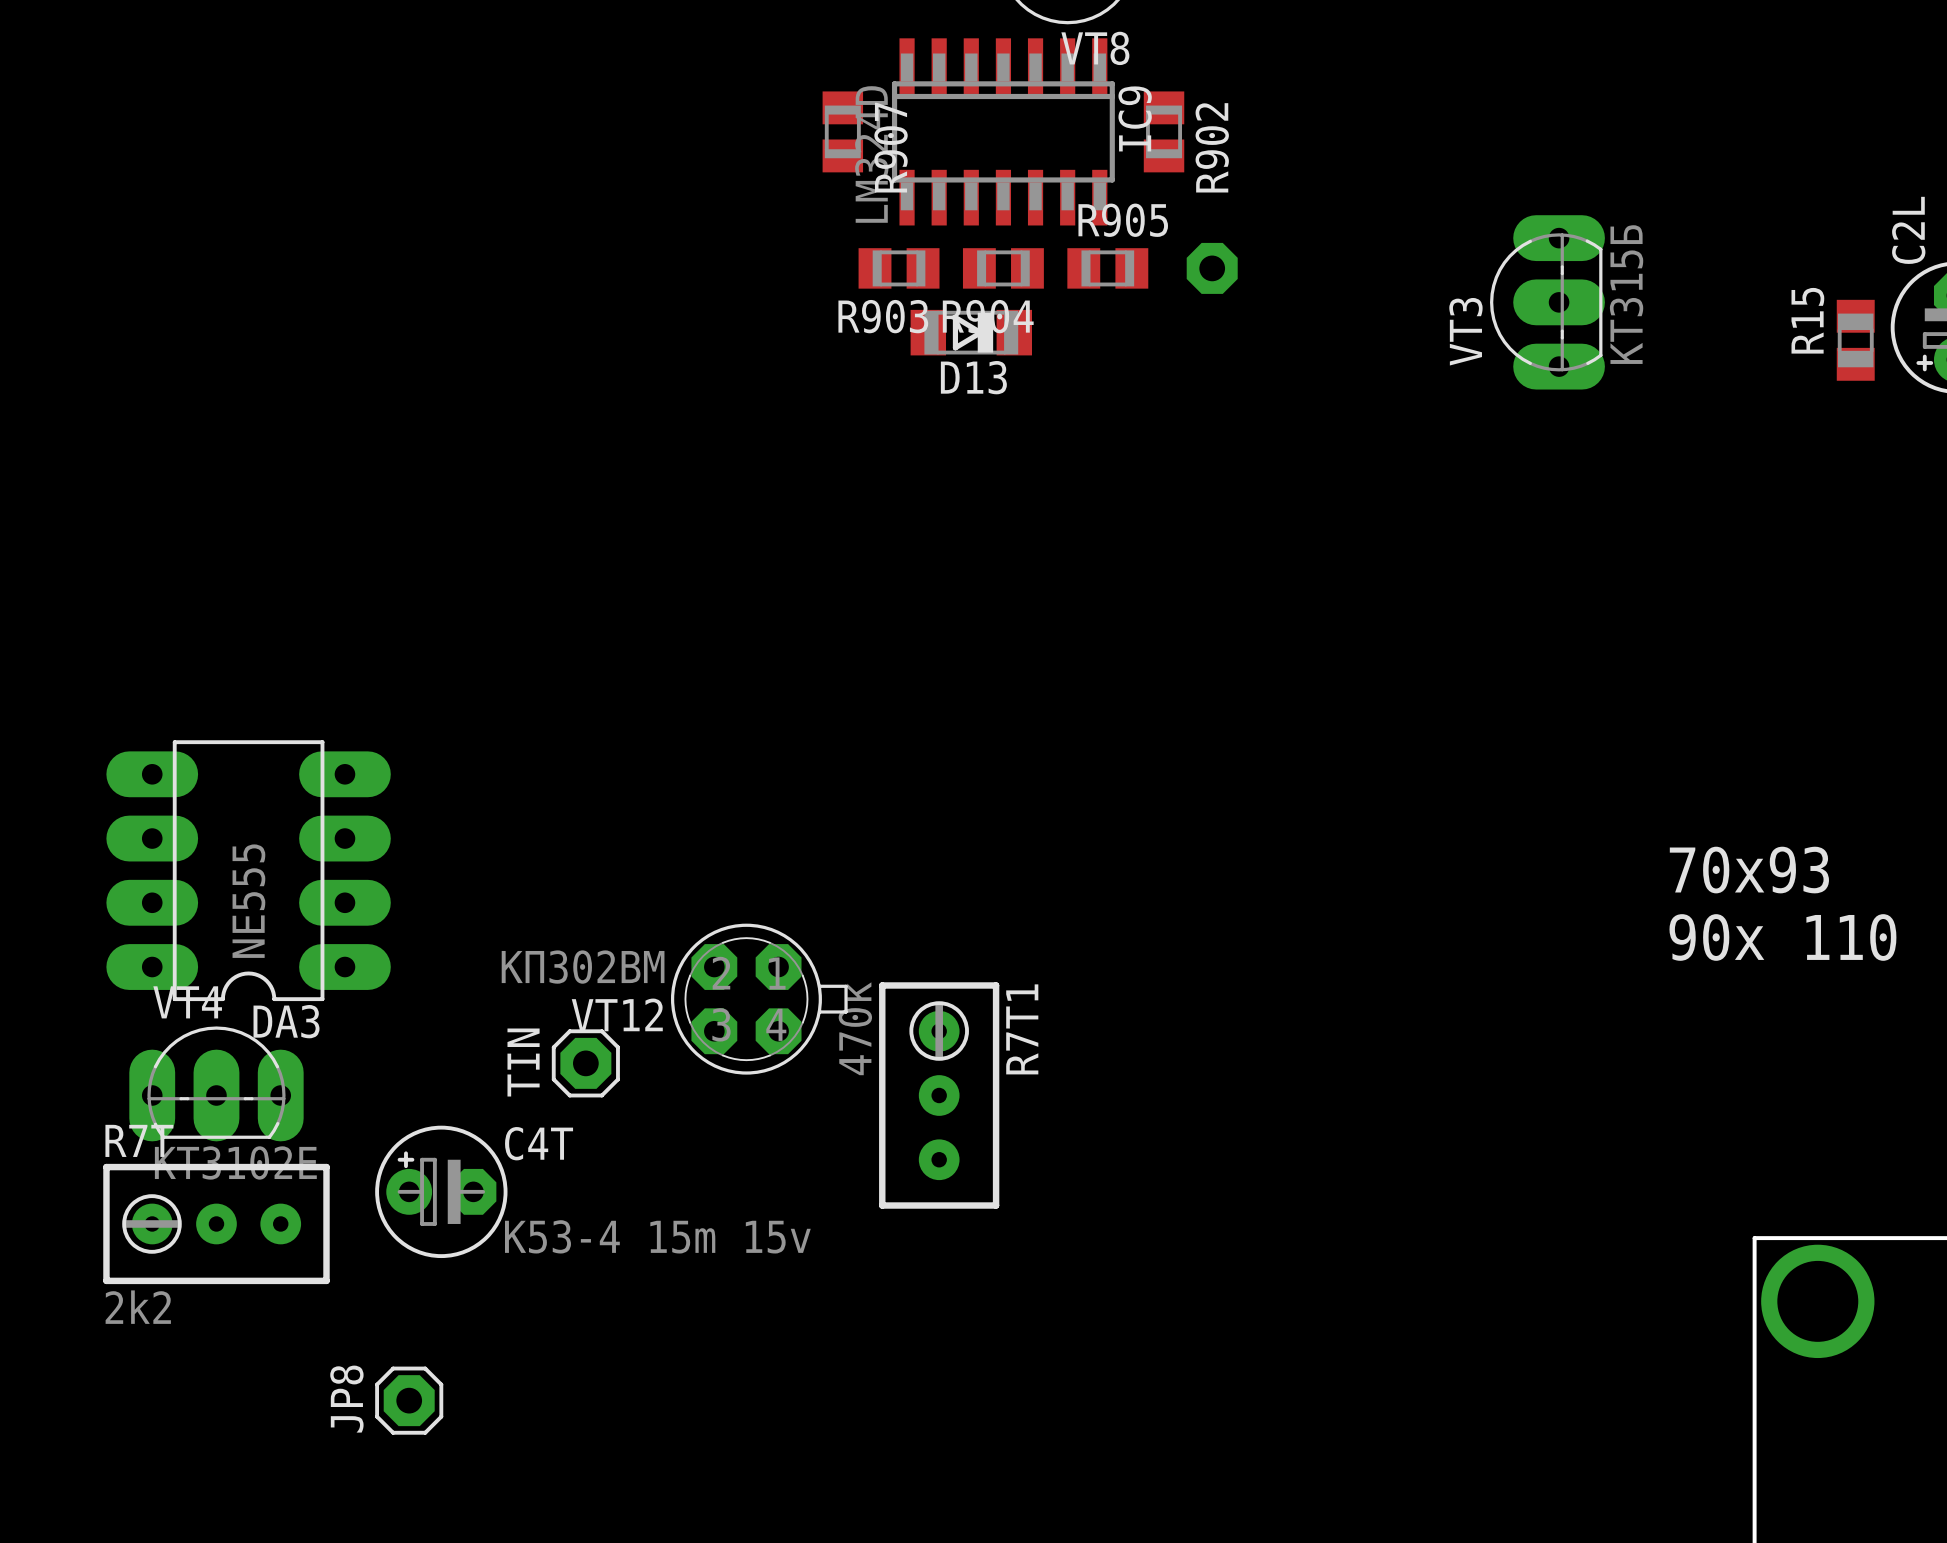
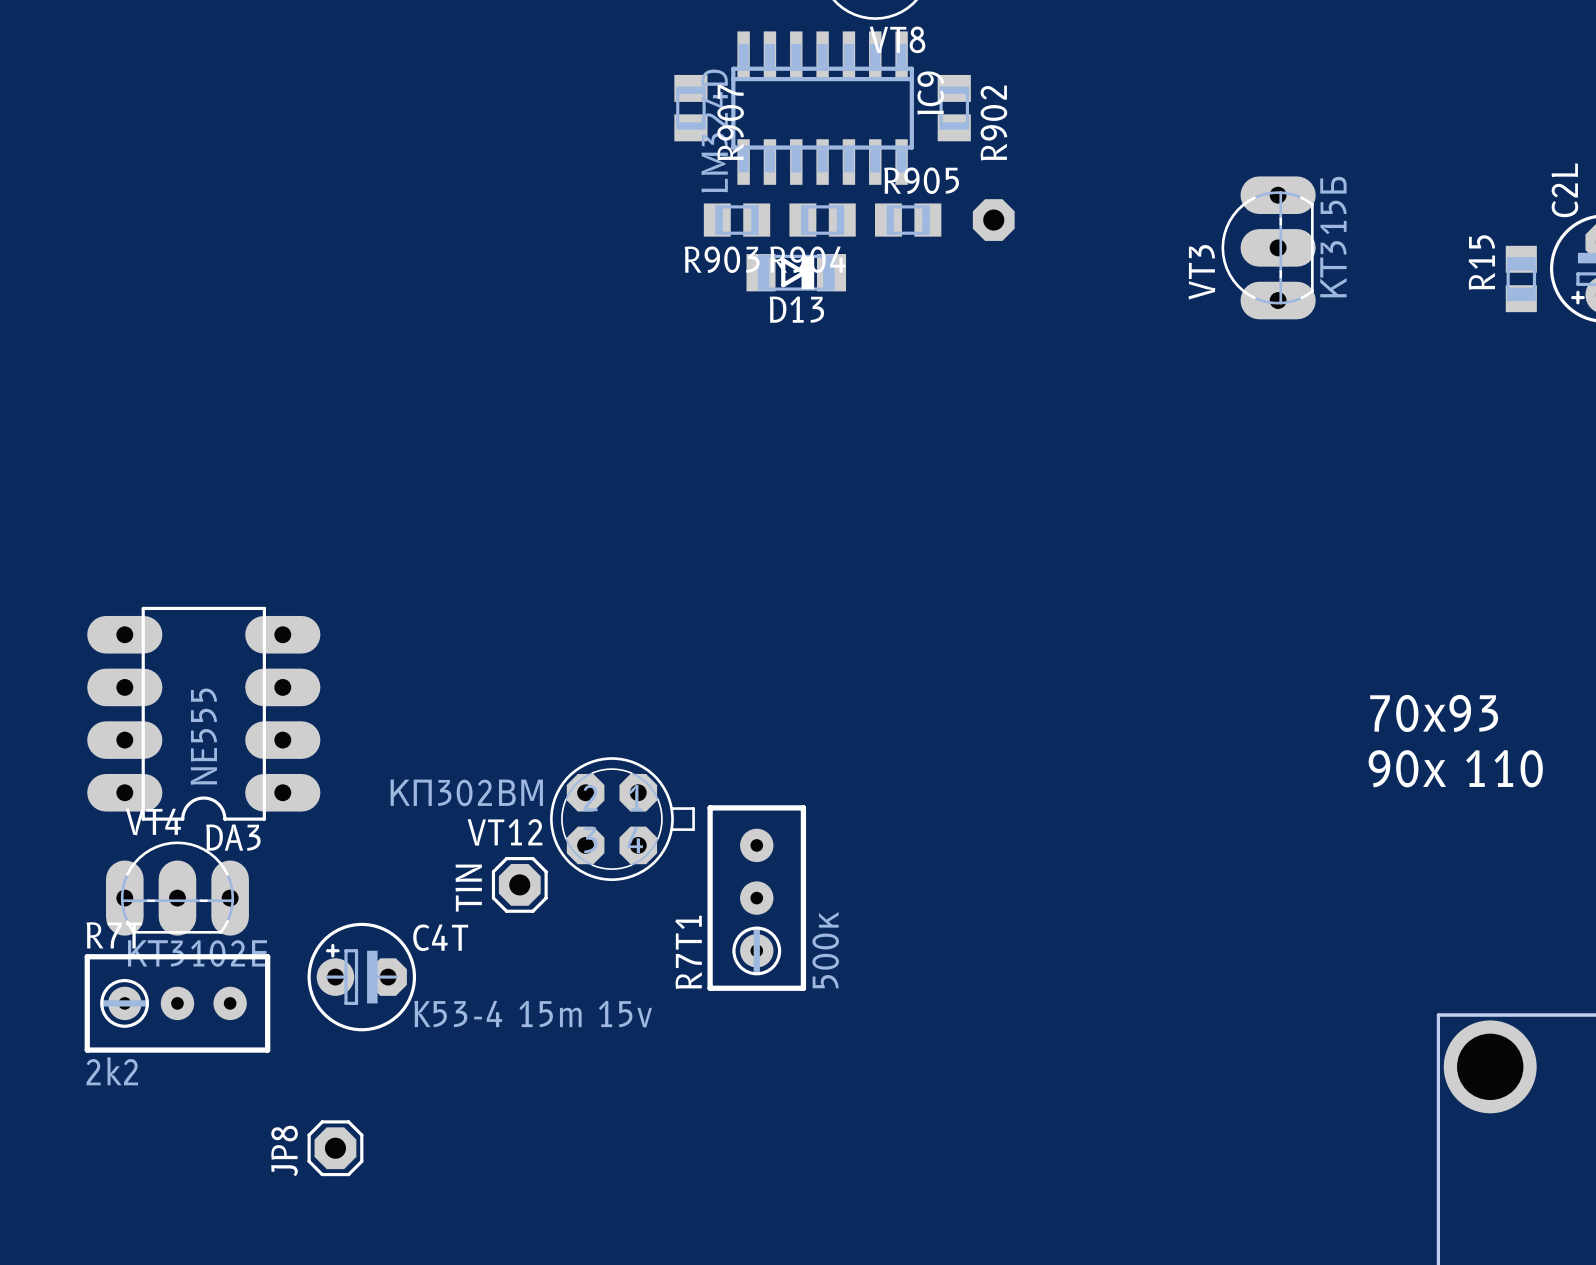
R7T1 value: 470к (855, 1028) -> 500к (825, 950)
TIN position: (585, 1063) -> (519, 884)
R7T1 rotation: 0° (939, 1095) -> 180° (756, 898)

